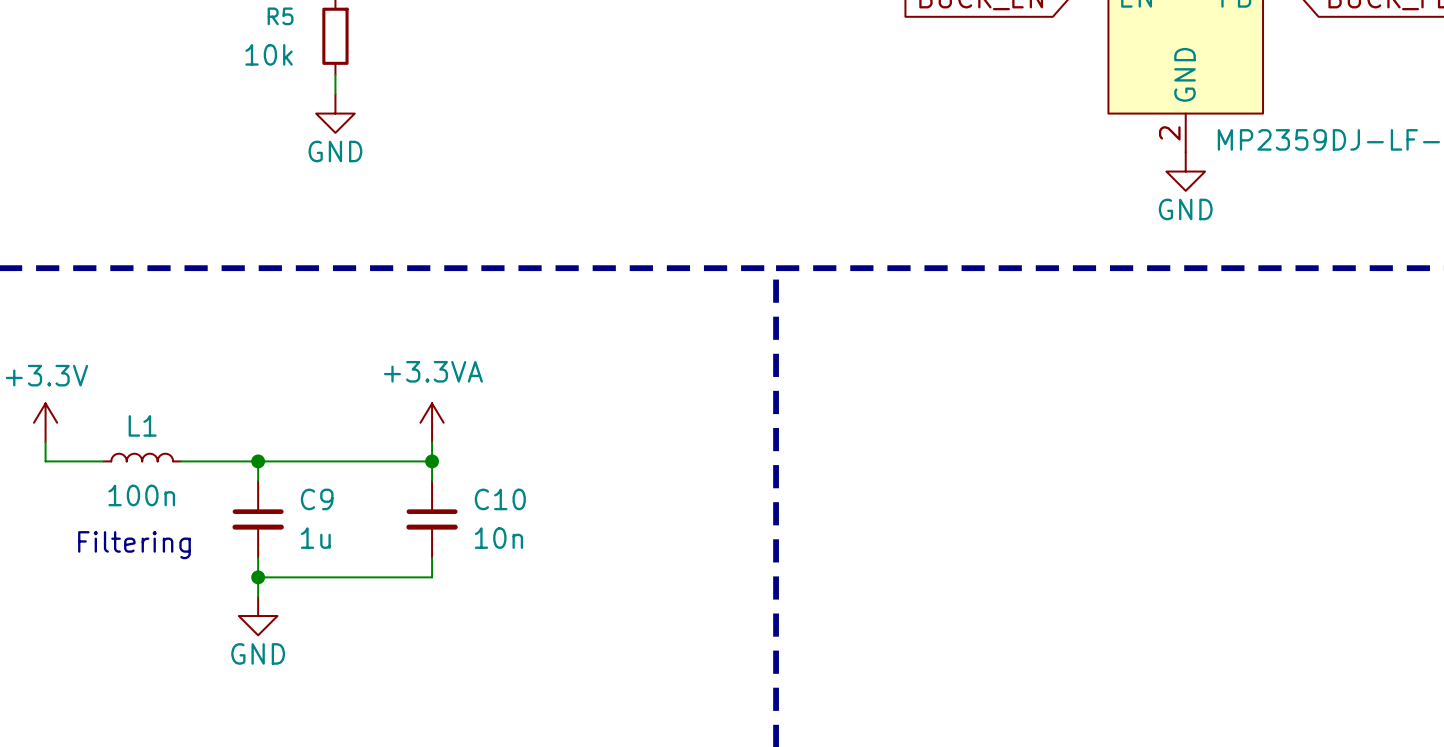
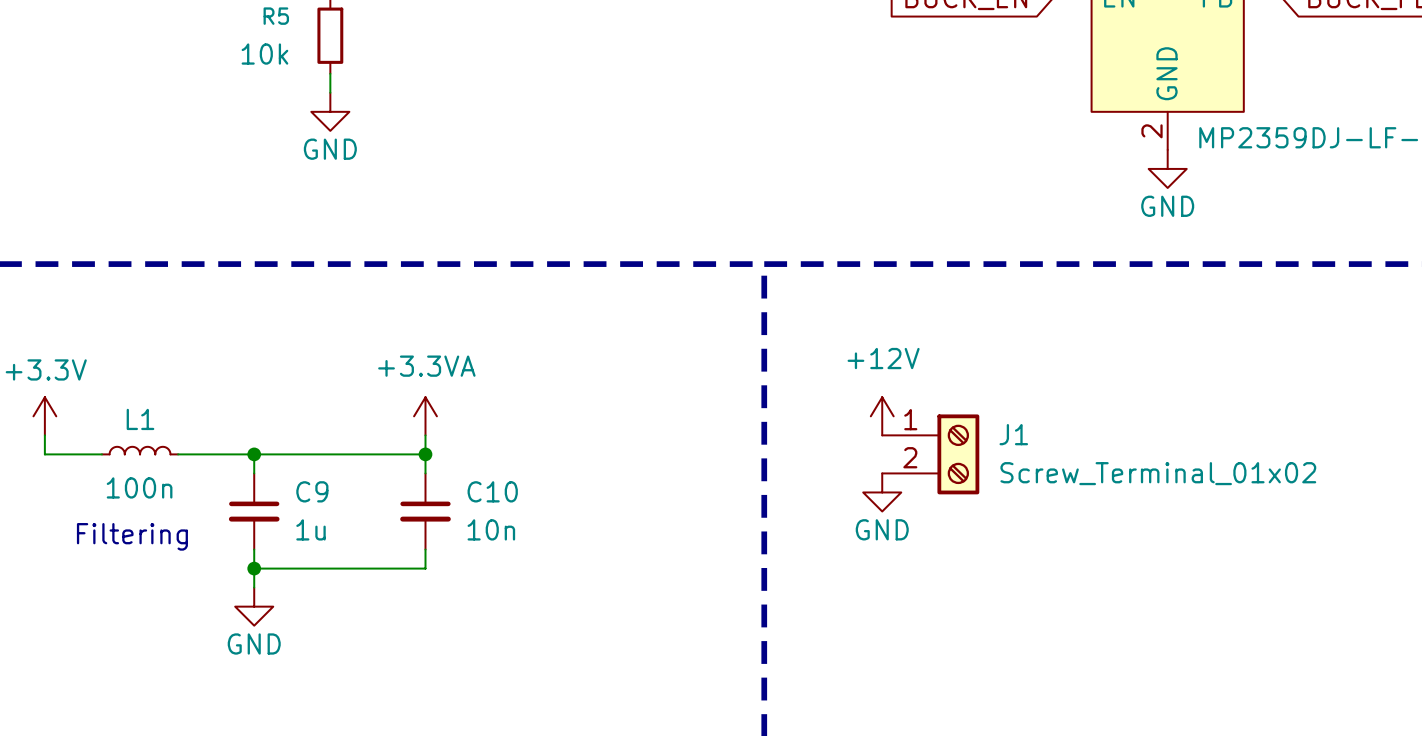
power symbol: none -> +12V (882, 416)
J1: none -> Screw_Terminal_01x02 (930, 454)
power symbol: none -> GND (882, 492)

